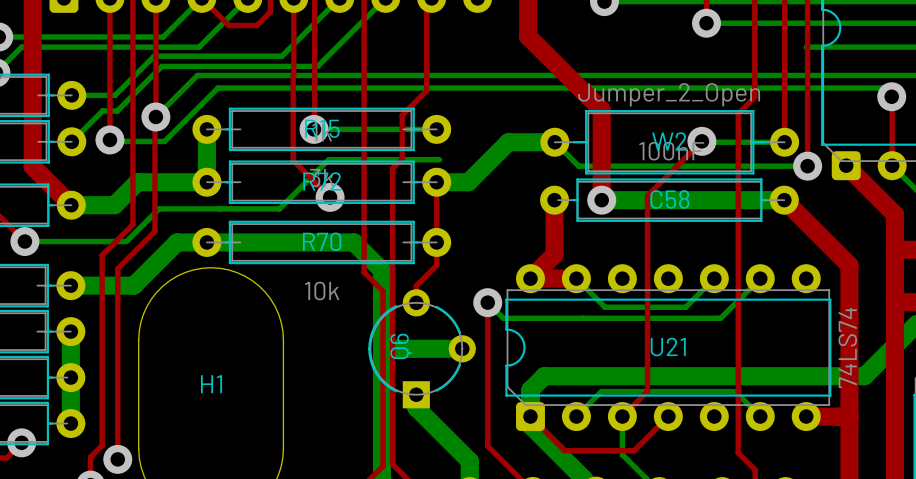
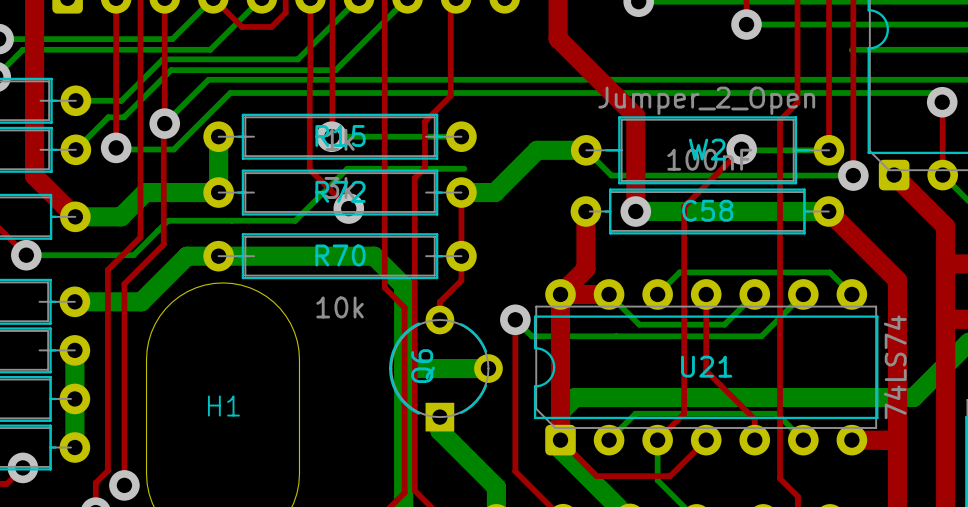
top track: none -> (560, 294) (560, 440)
bottom track: none -> (657, 294) (679, 272) (829, 272) (851, 294)
top track: none -> (706, 294) (706, 370) (754, 419) (754, 440)

